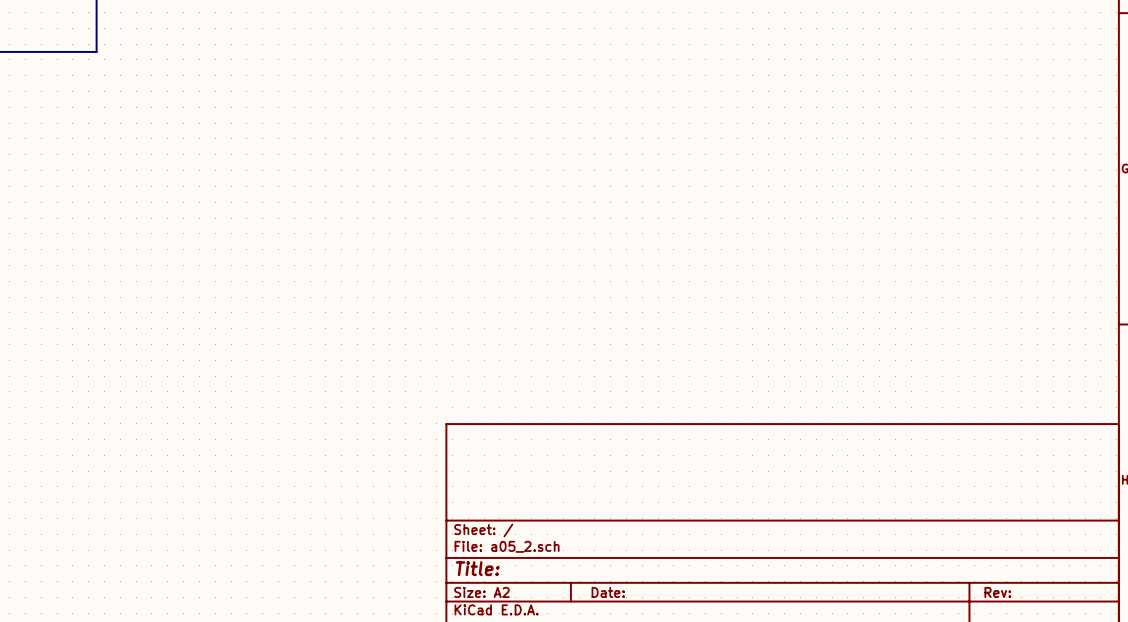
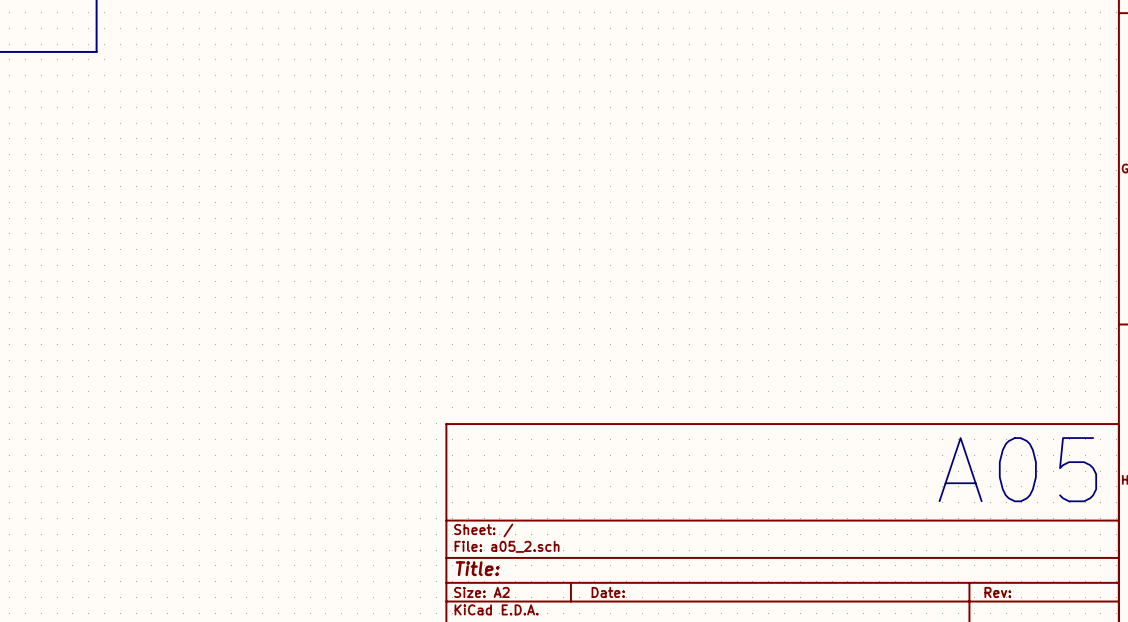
text: none -> A05 (1017, 469)

